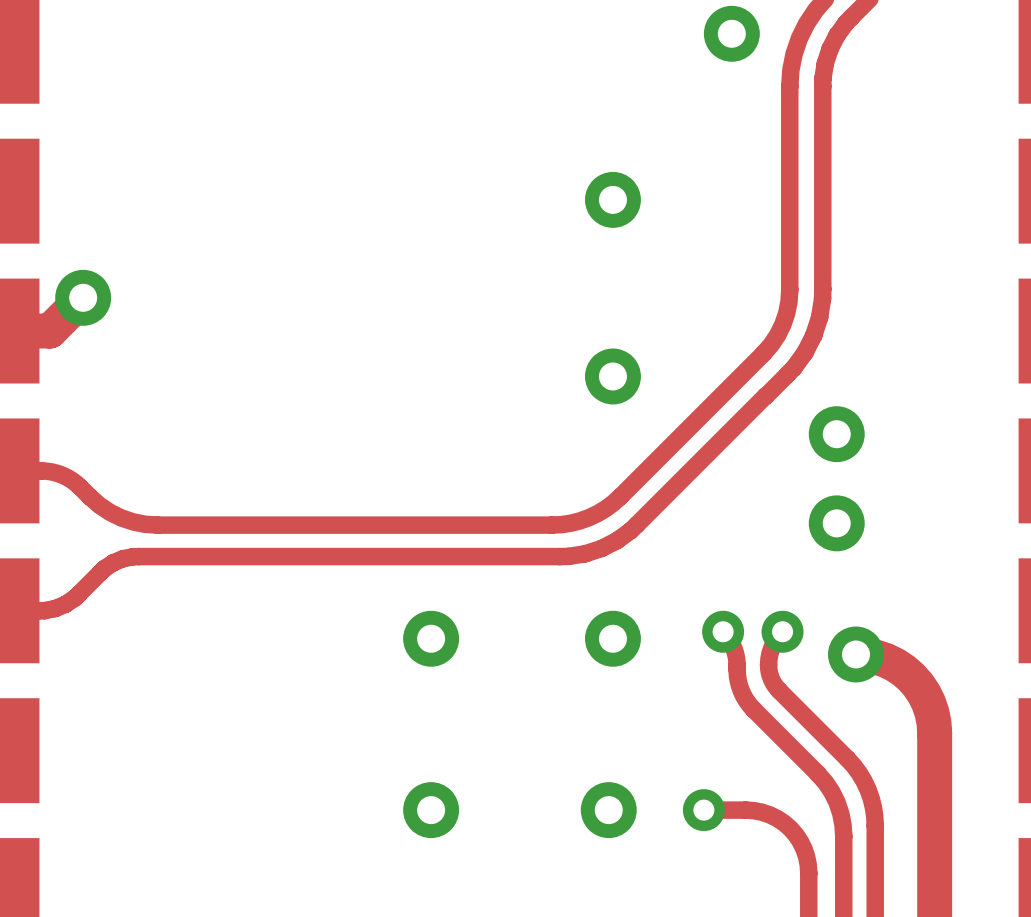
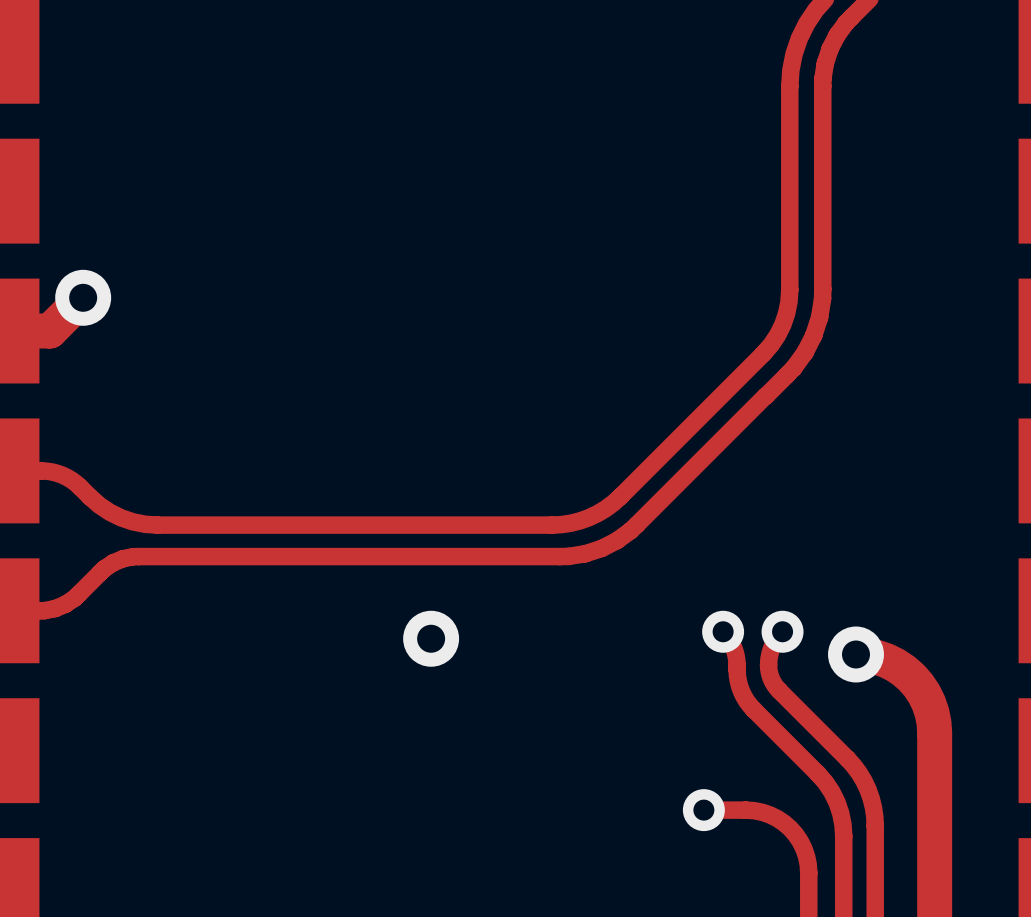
via: (731, 33) -> none
via: (612, 199) -> none
via: (612, 376) -> none
via: (836, 434) -> none
via: (836, 523) -> none
via: (612, 638) -> none
via: (431, 810) -> none
via: (608, 810) -> none

